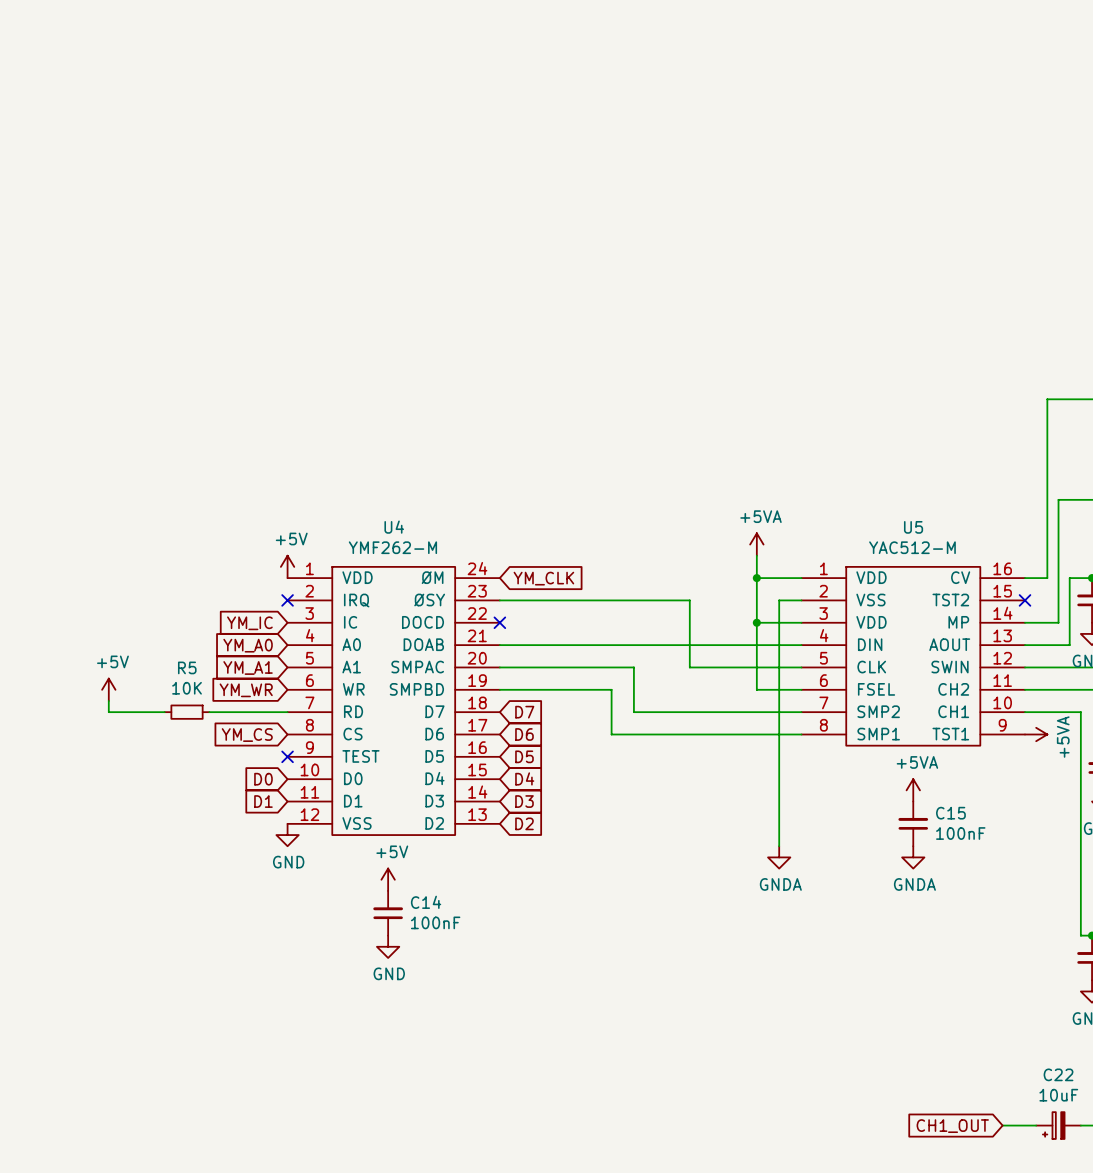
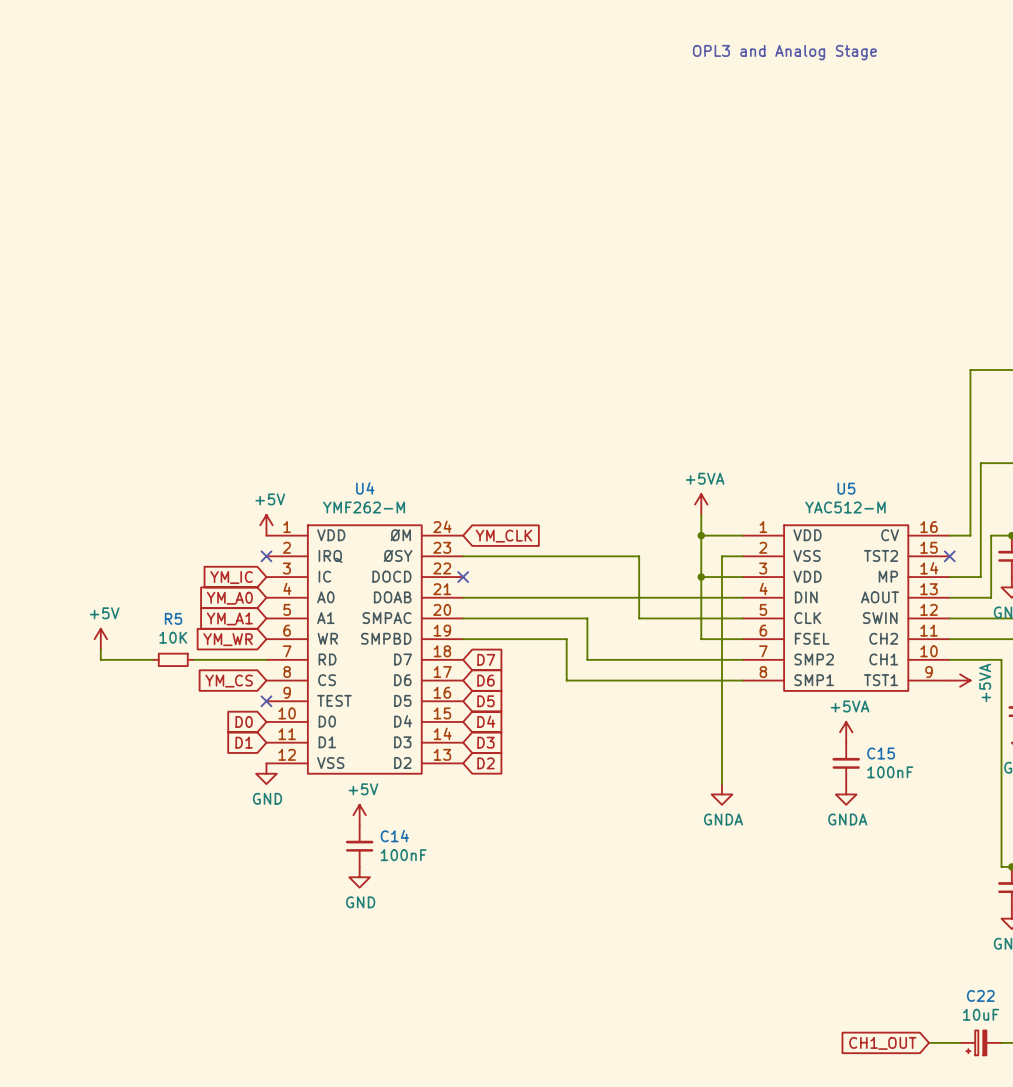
text: none -> OPL3 and Analog Stage (784, 52)

